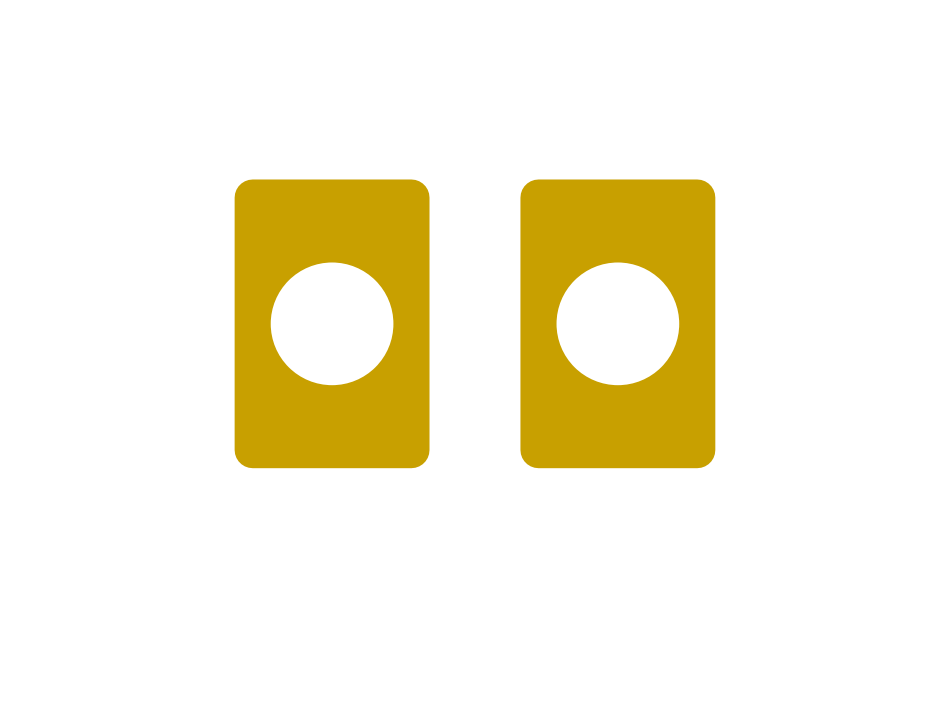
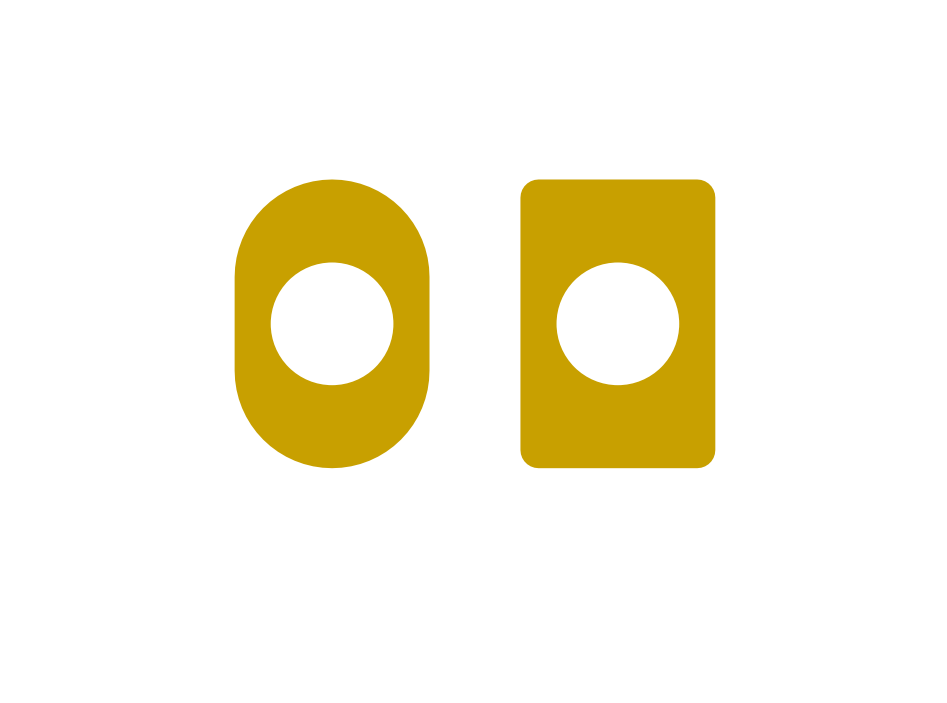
part footprint: [234, 179, 716, 469] -> [234, 179, 716, 469]

